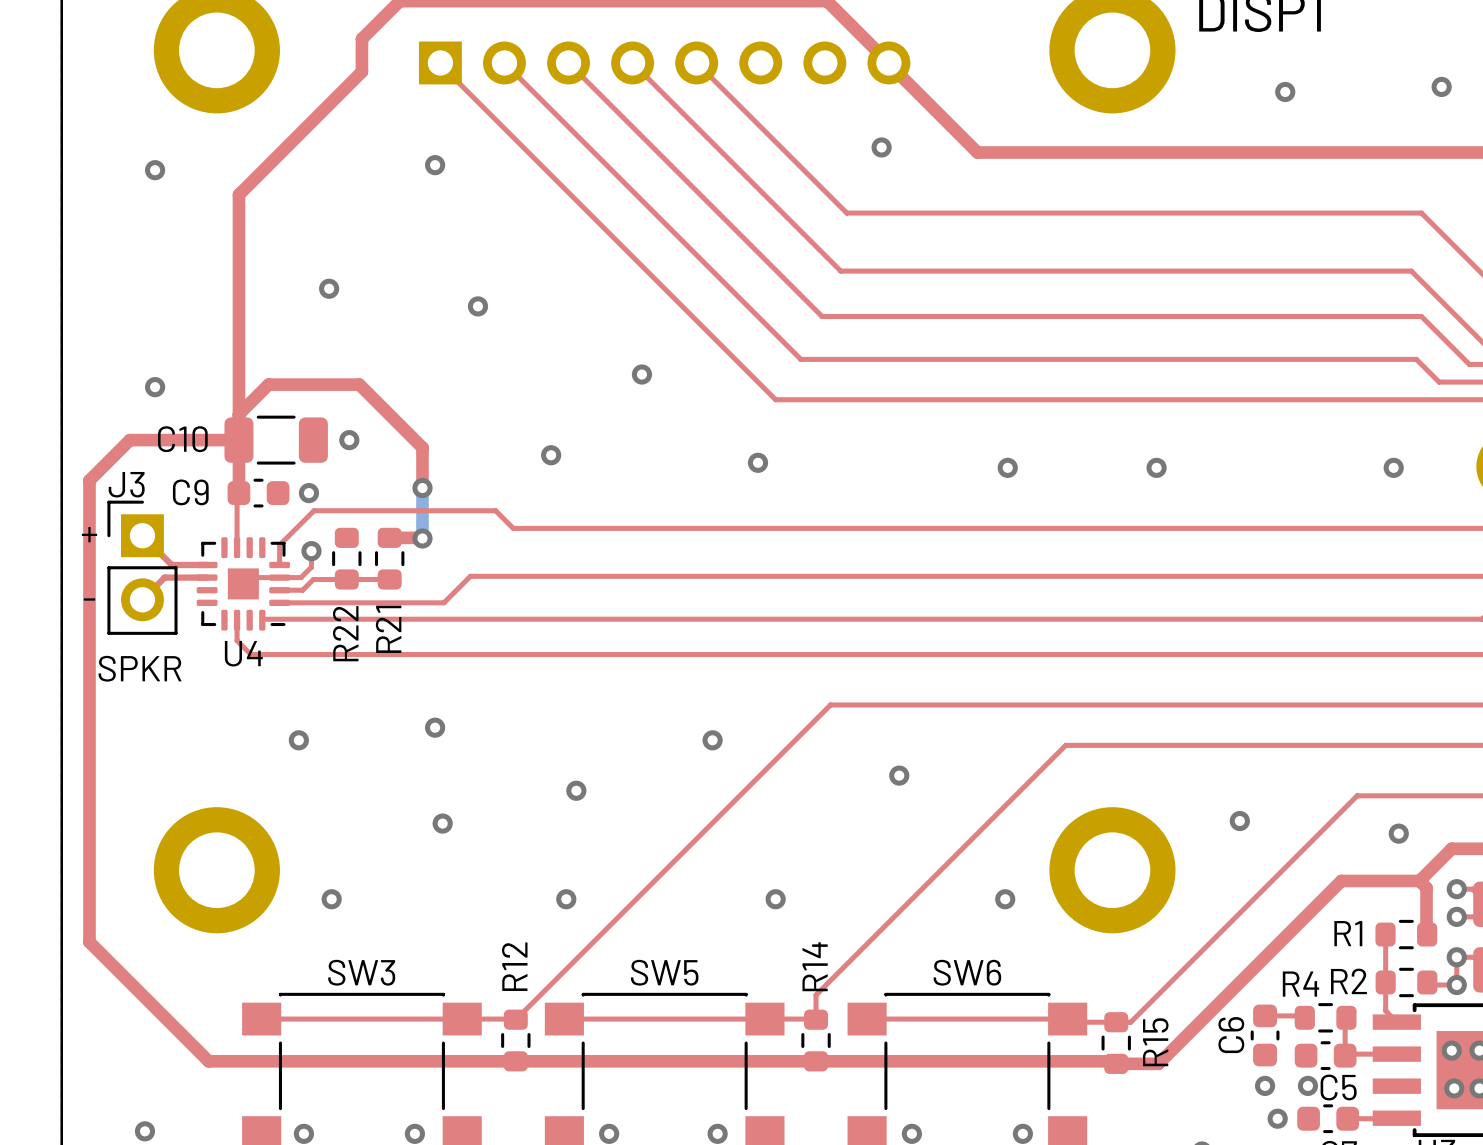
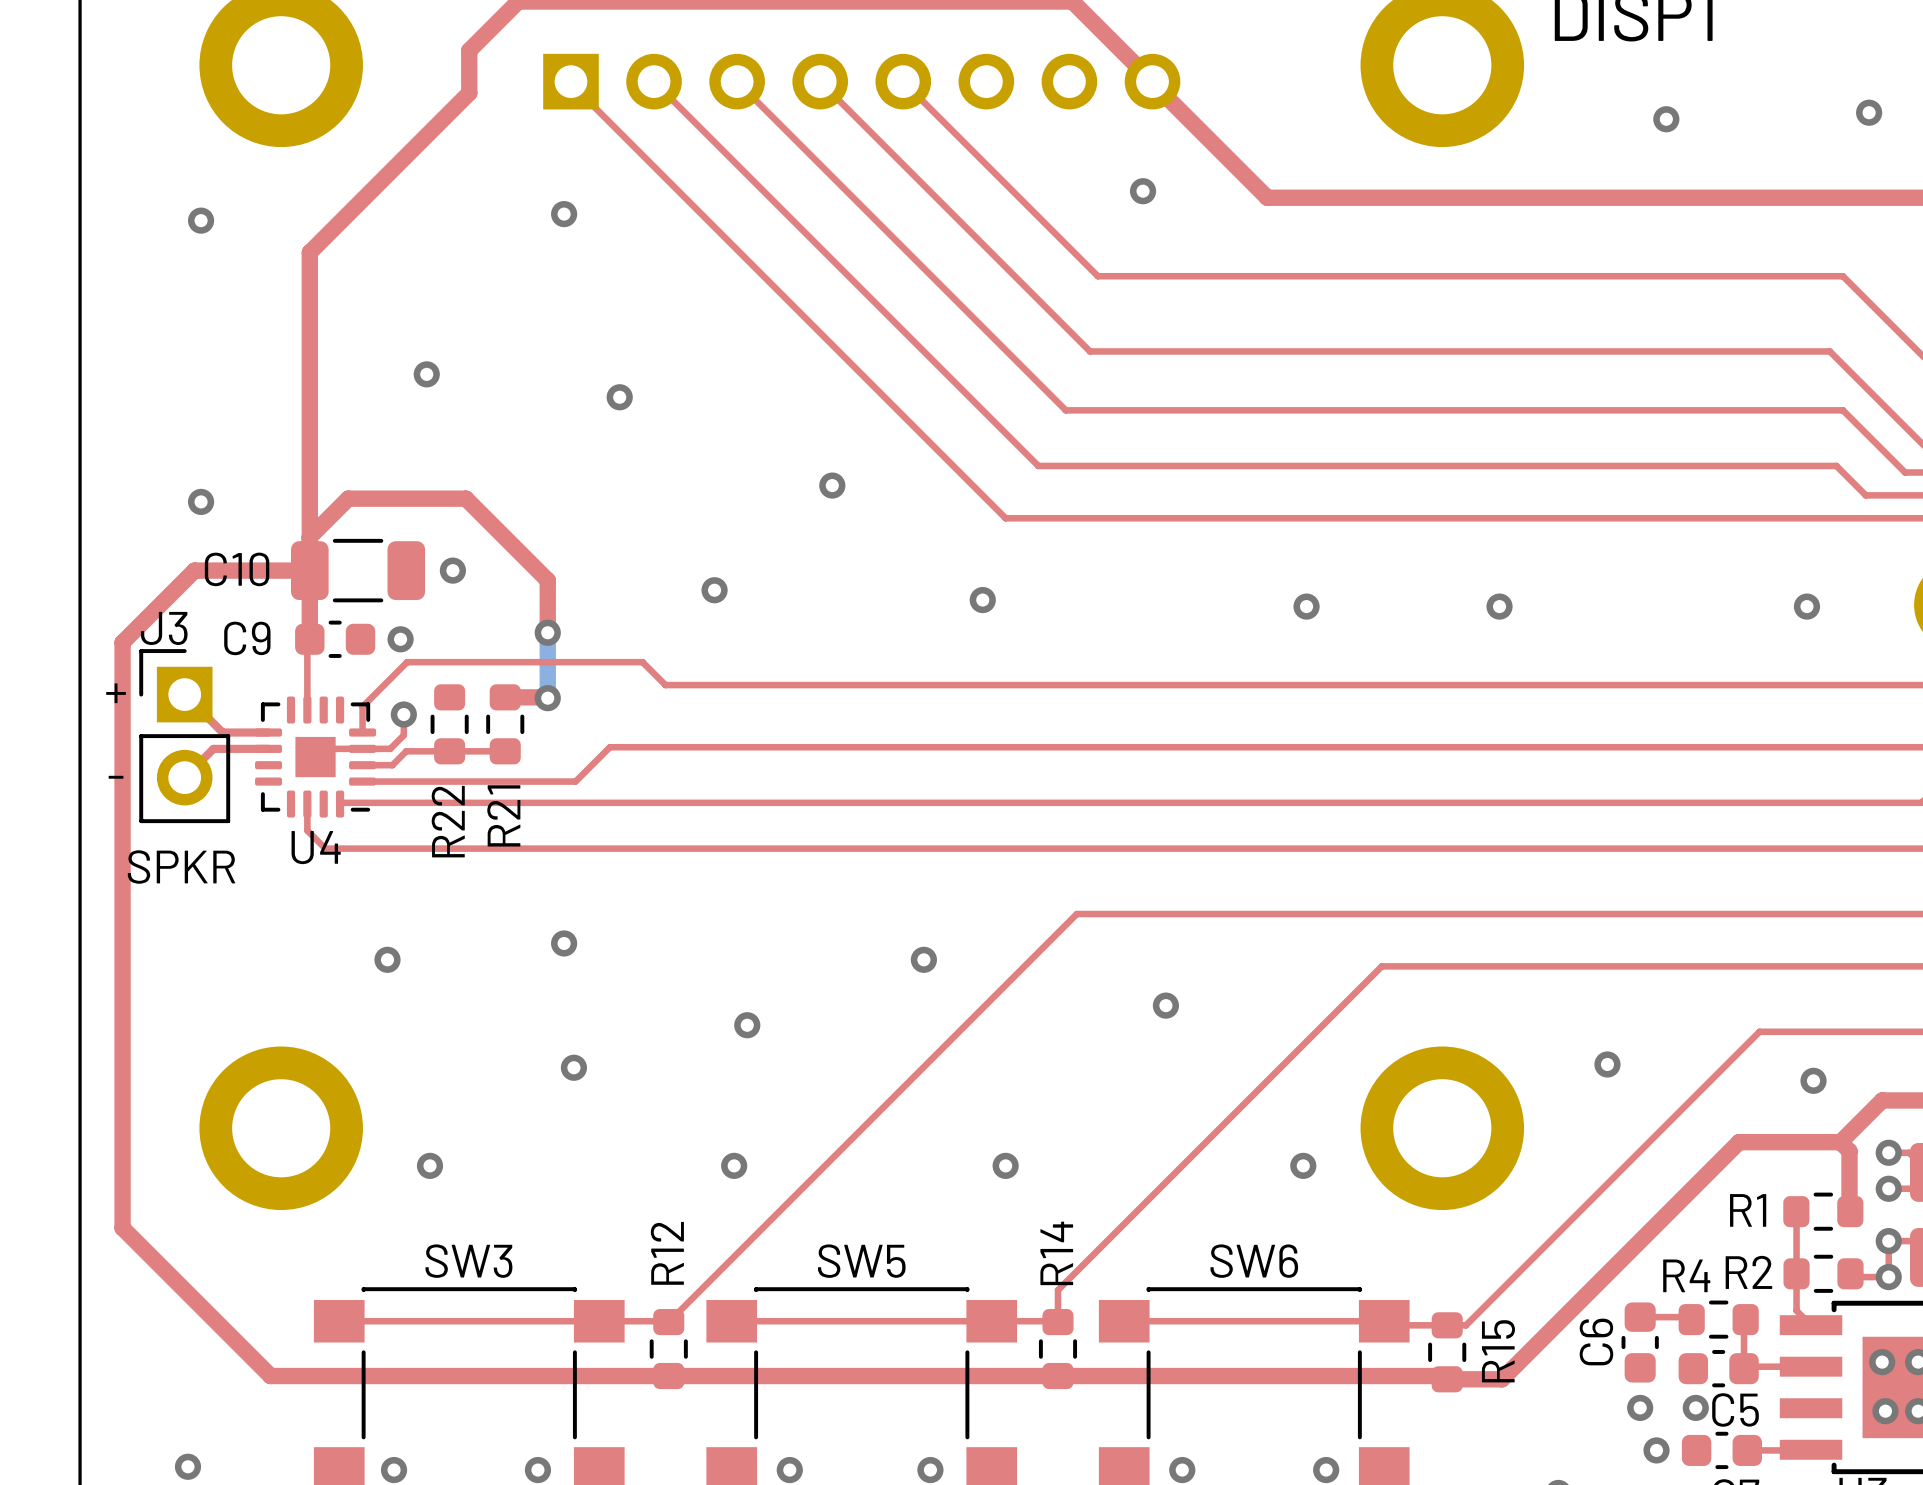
top track: (150, 440) (129, 440) (89, 480) (89, 942) (94, 947) -> (194, 570) (122, 642) (122, 1228)

